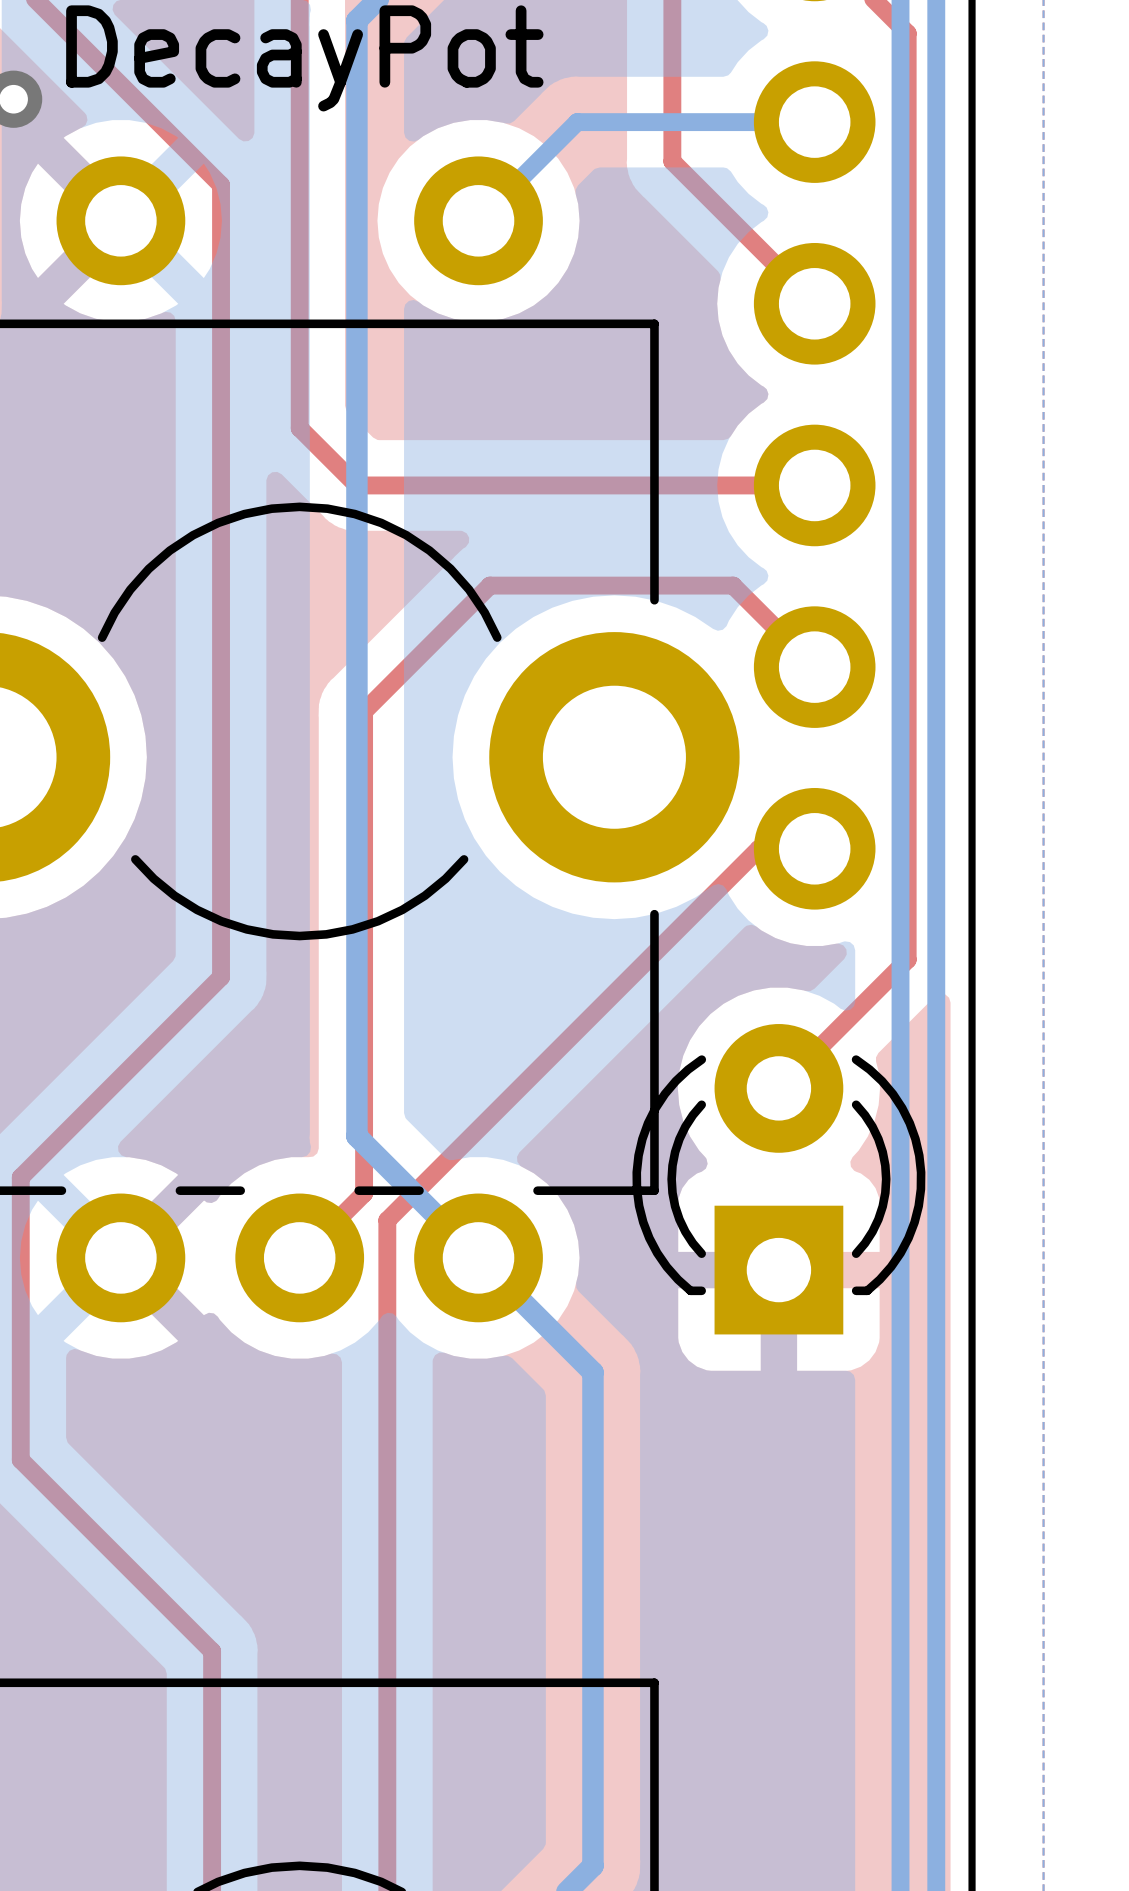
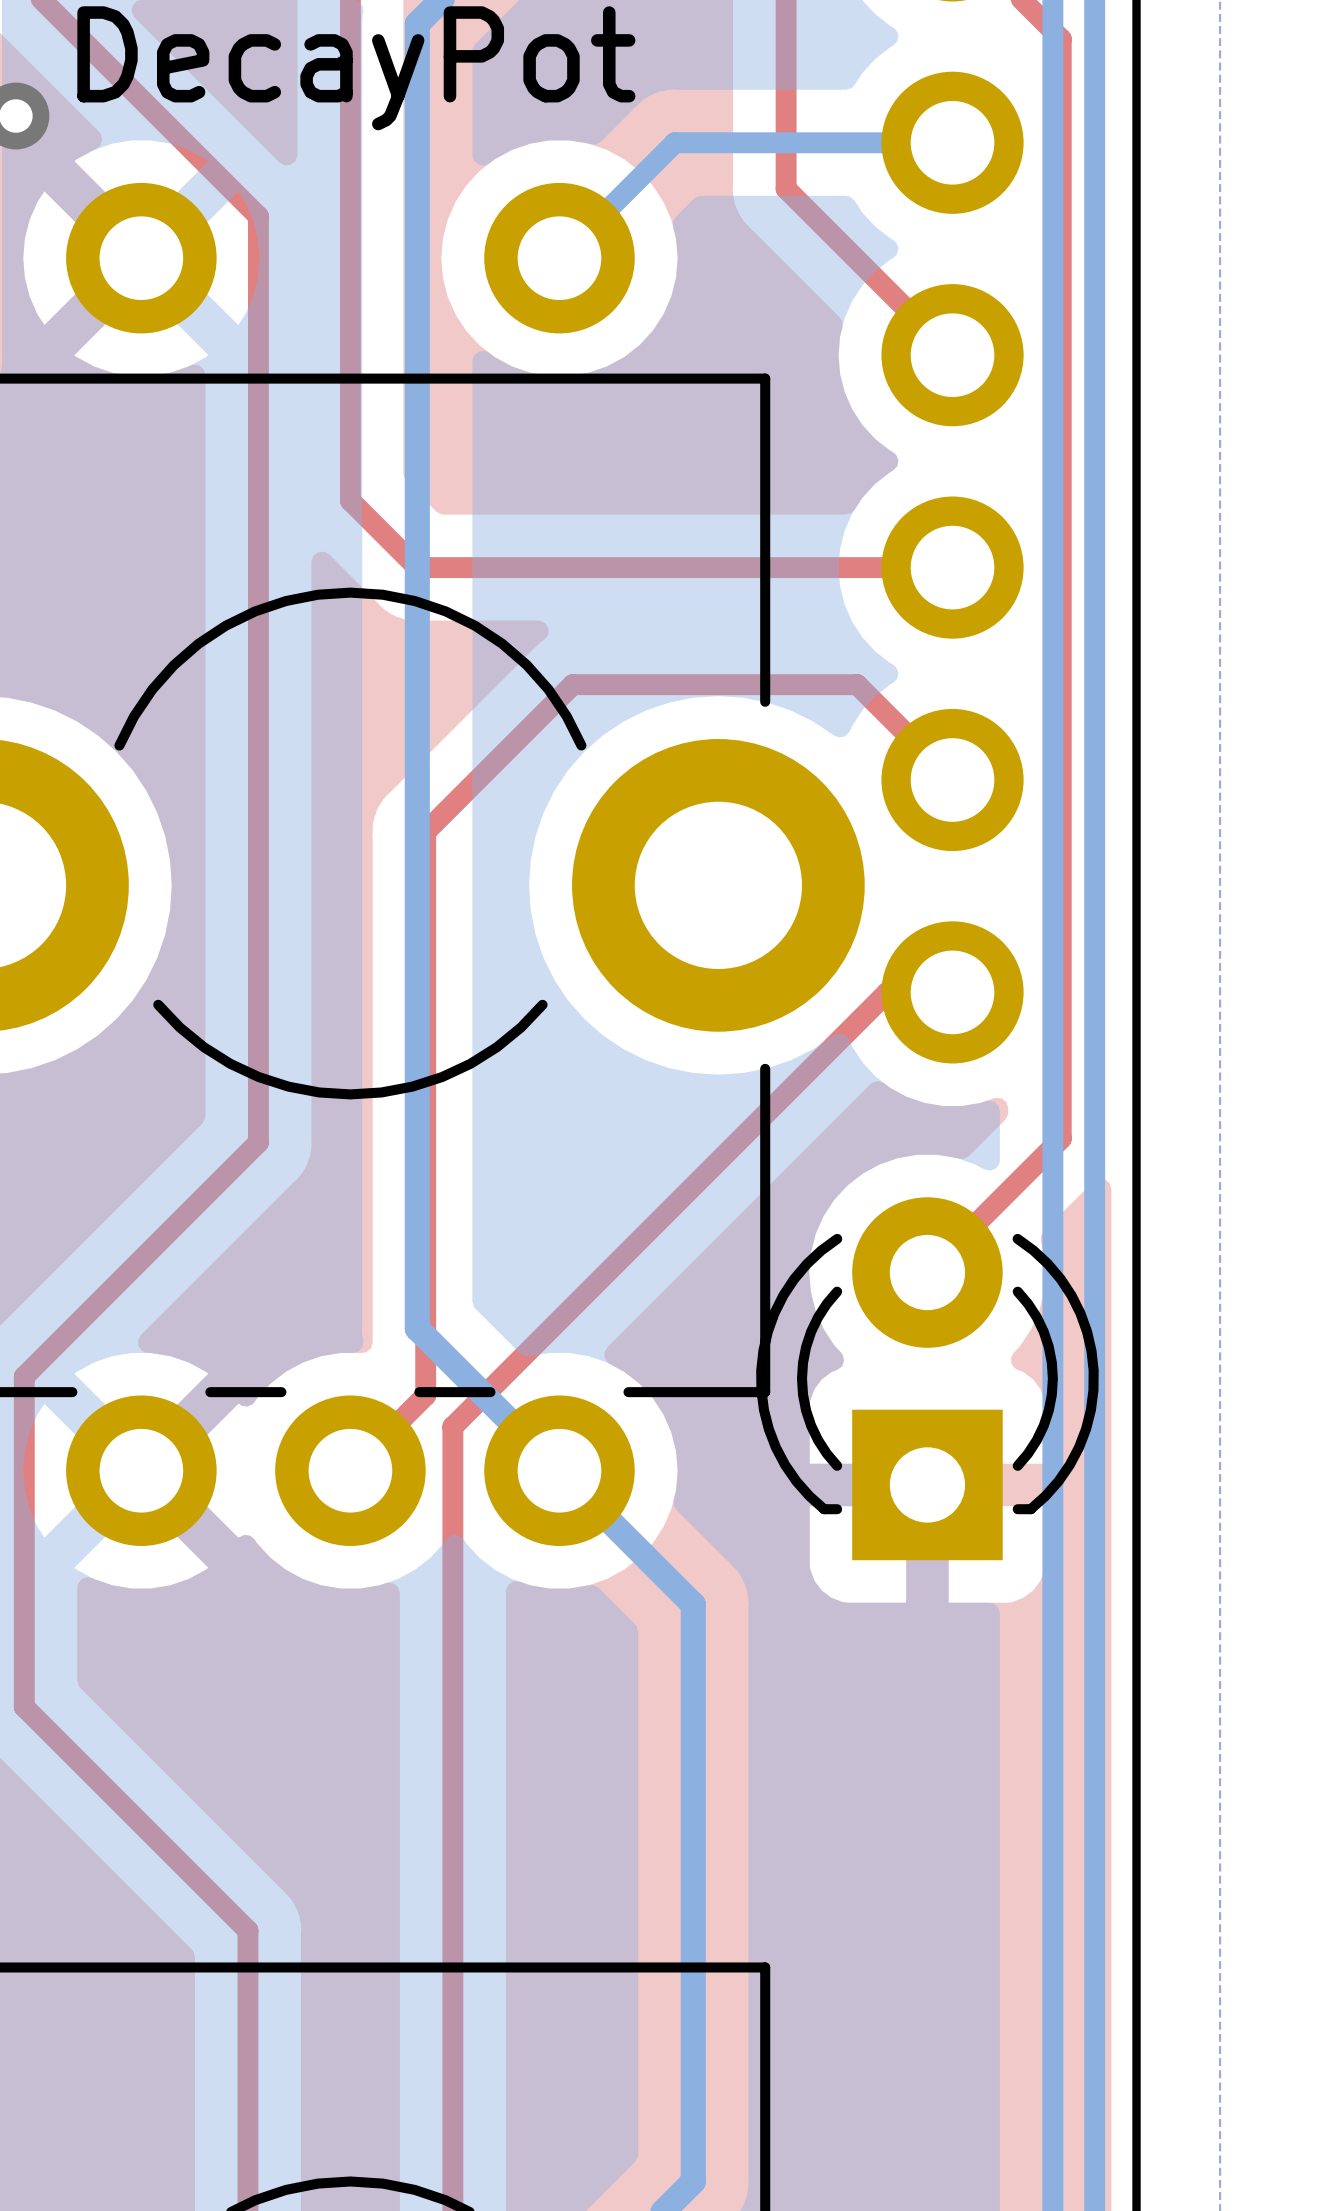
top track: (907, 959) (778, 1088) -> (1061, 1122) (1061, 1138) (927, 1272)
part position: (778, 1179) -> (927, 1378)

